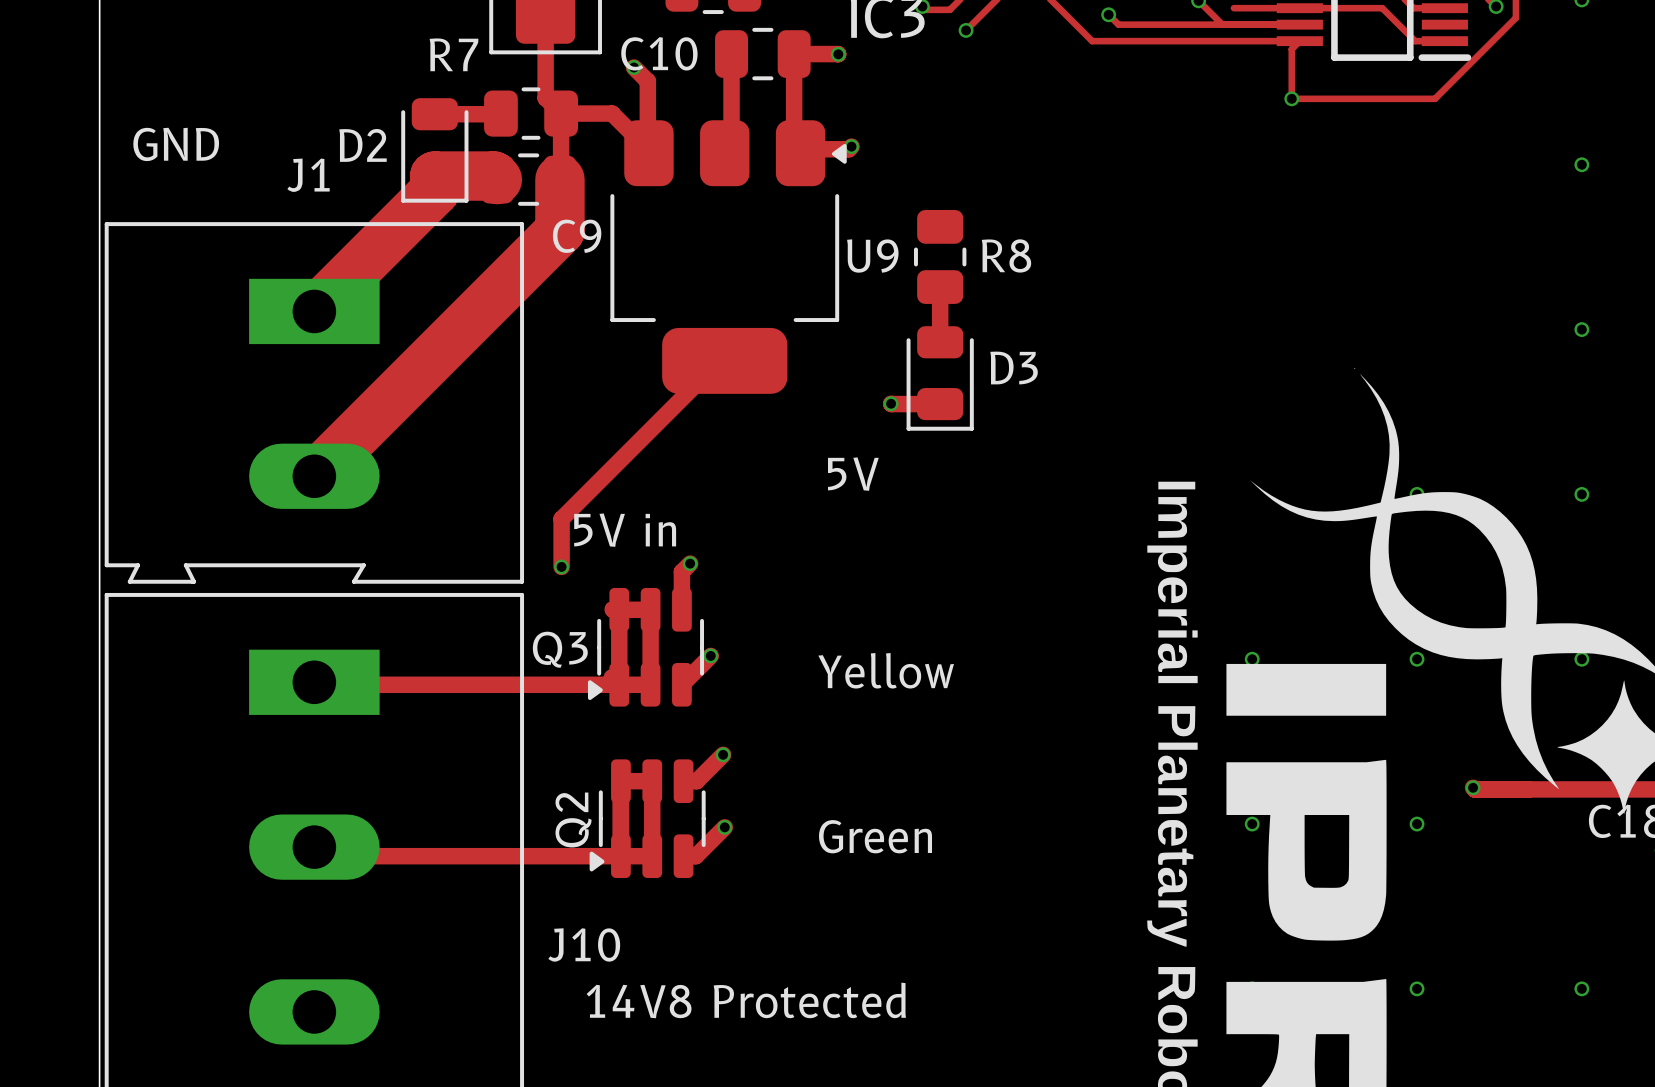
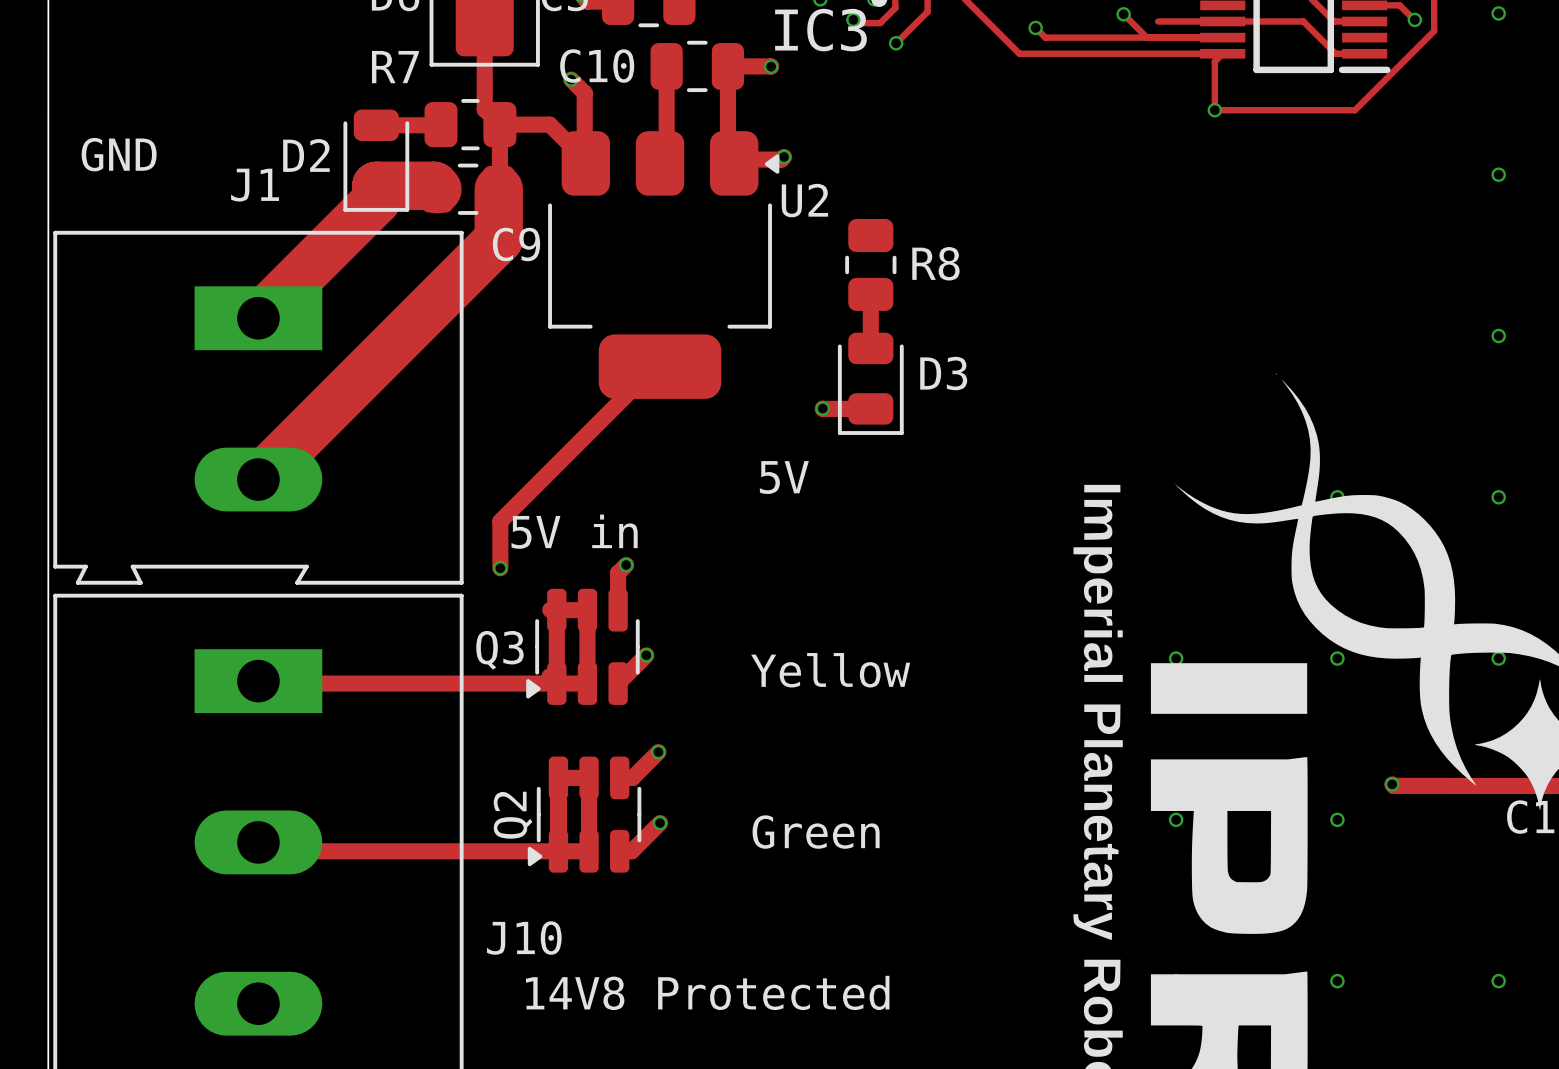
U9 name: U9 (872, 256) -> U2 (804, 200)

